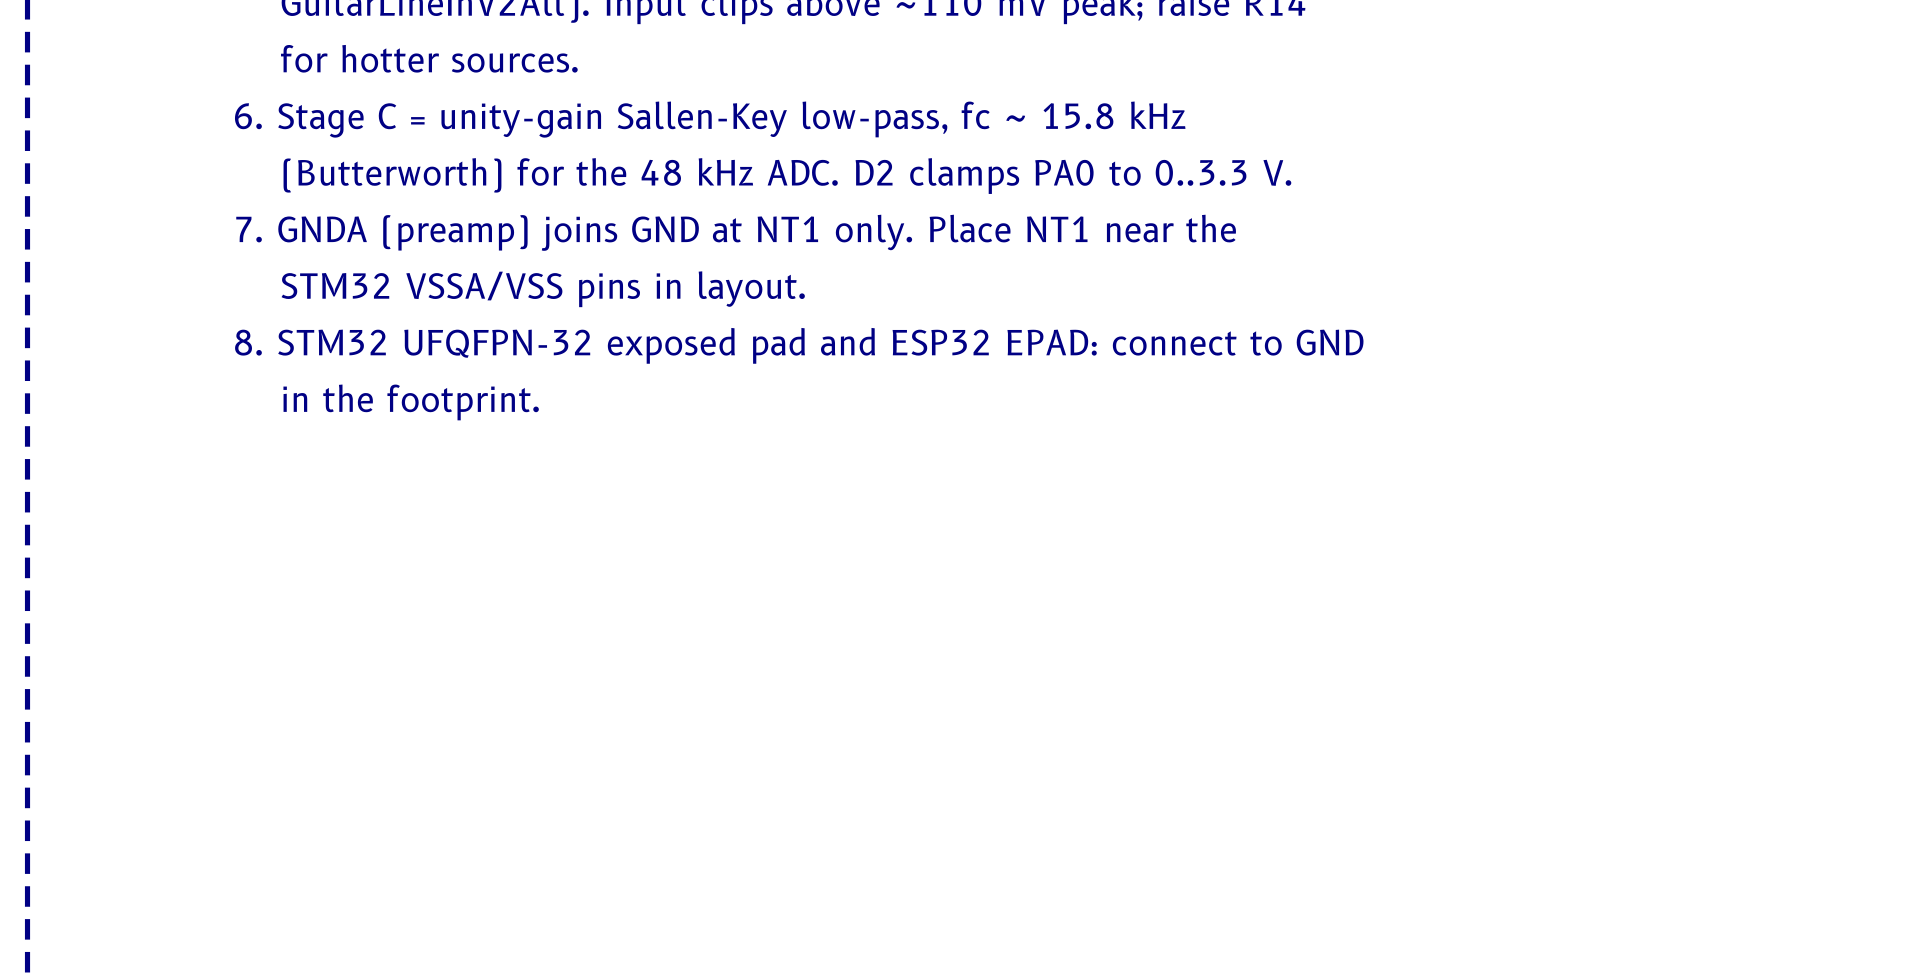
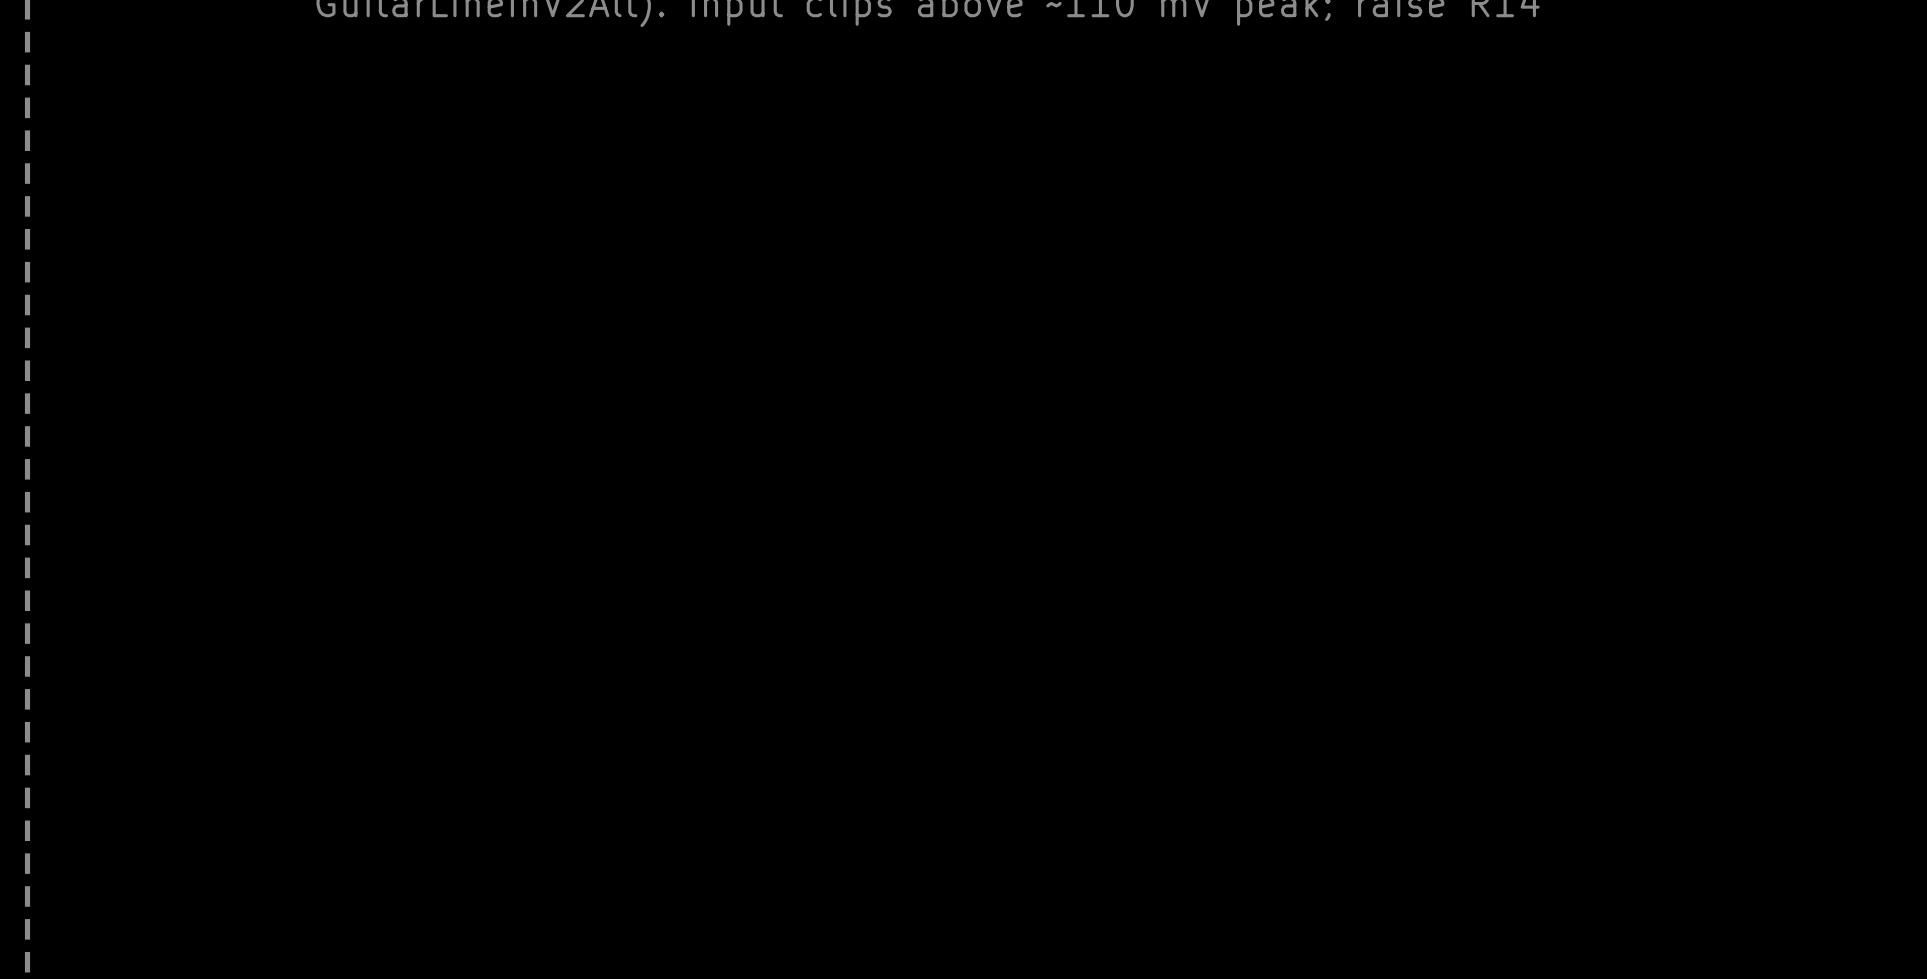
text: for hotter sources. (429, 58) -> none
text: 6. Stage C = unity-gain Sallen-Key low-pass, fc ~ 15.8 kHz (710, 119) -> none
text: (Butterworth) for the 48 kHz ADC. D2 clamps PA0 to 0..3.3 V. (787, 176) -> none
text: 7. GNDA (preamp) joins GND at NT1 only. Place NT1 near the (736, 232) -> none
text: STM32 VSSA/VSS pins in layout. (543, 289) -> none
text: 8. STM32 UFQFPN-32 exposed pad and ESP32 EPAD: connect to GND (799, 345) -> none
text: in the footprint. (411, 402) -> none

